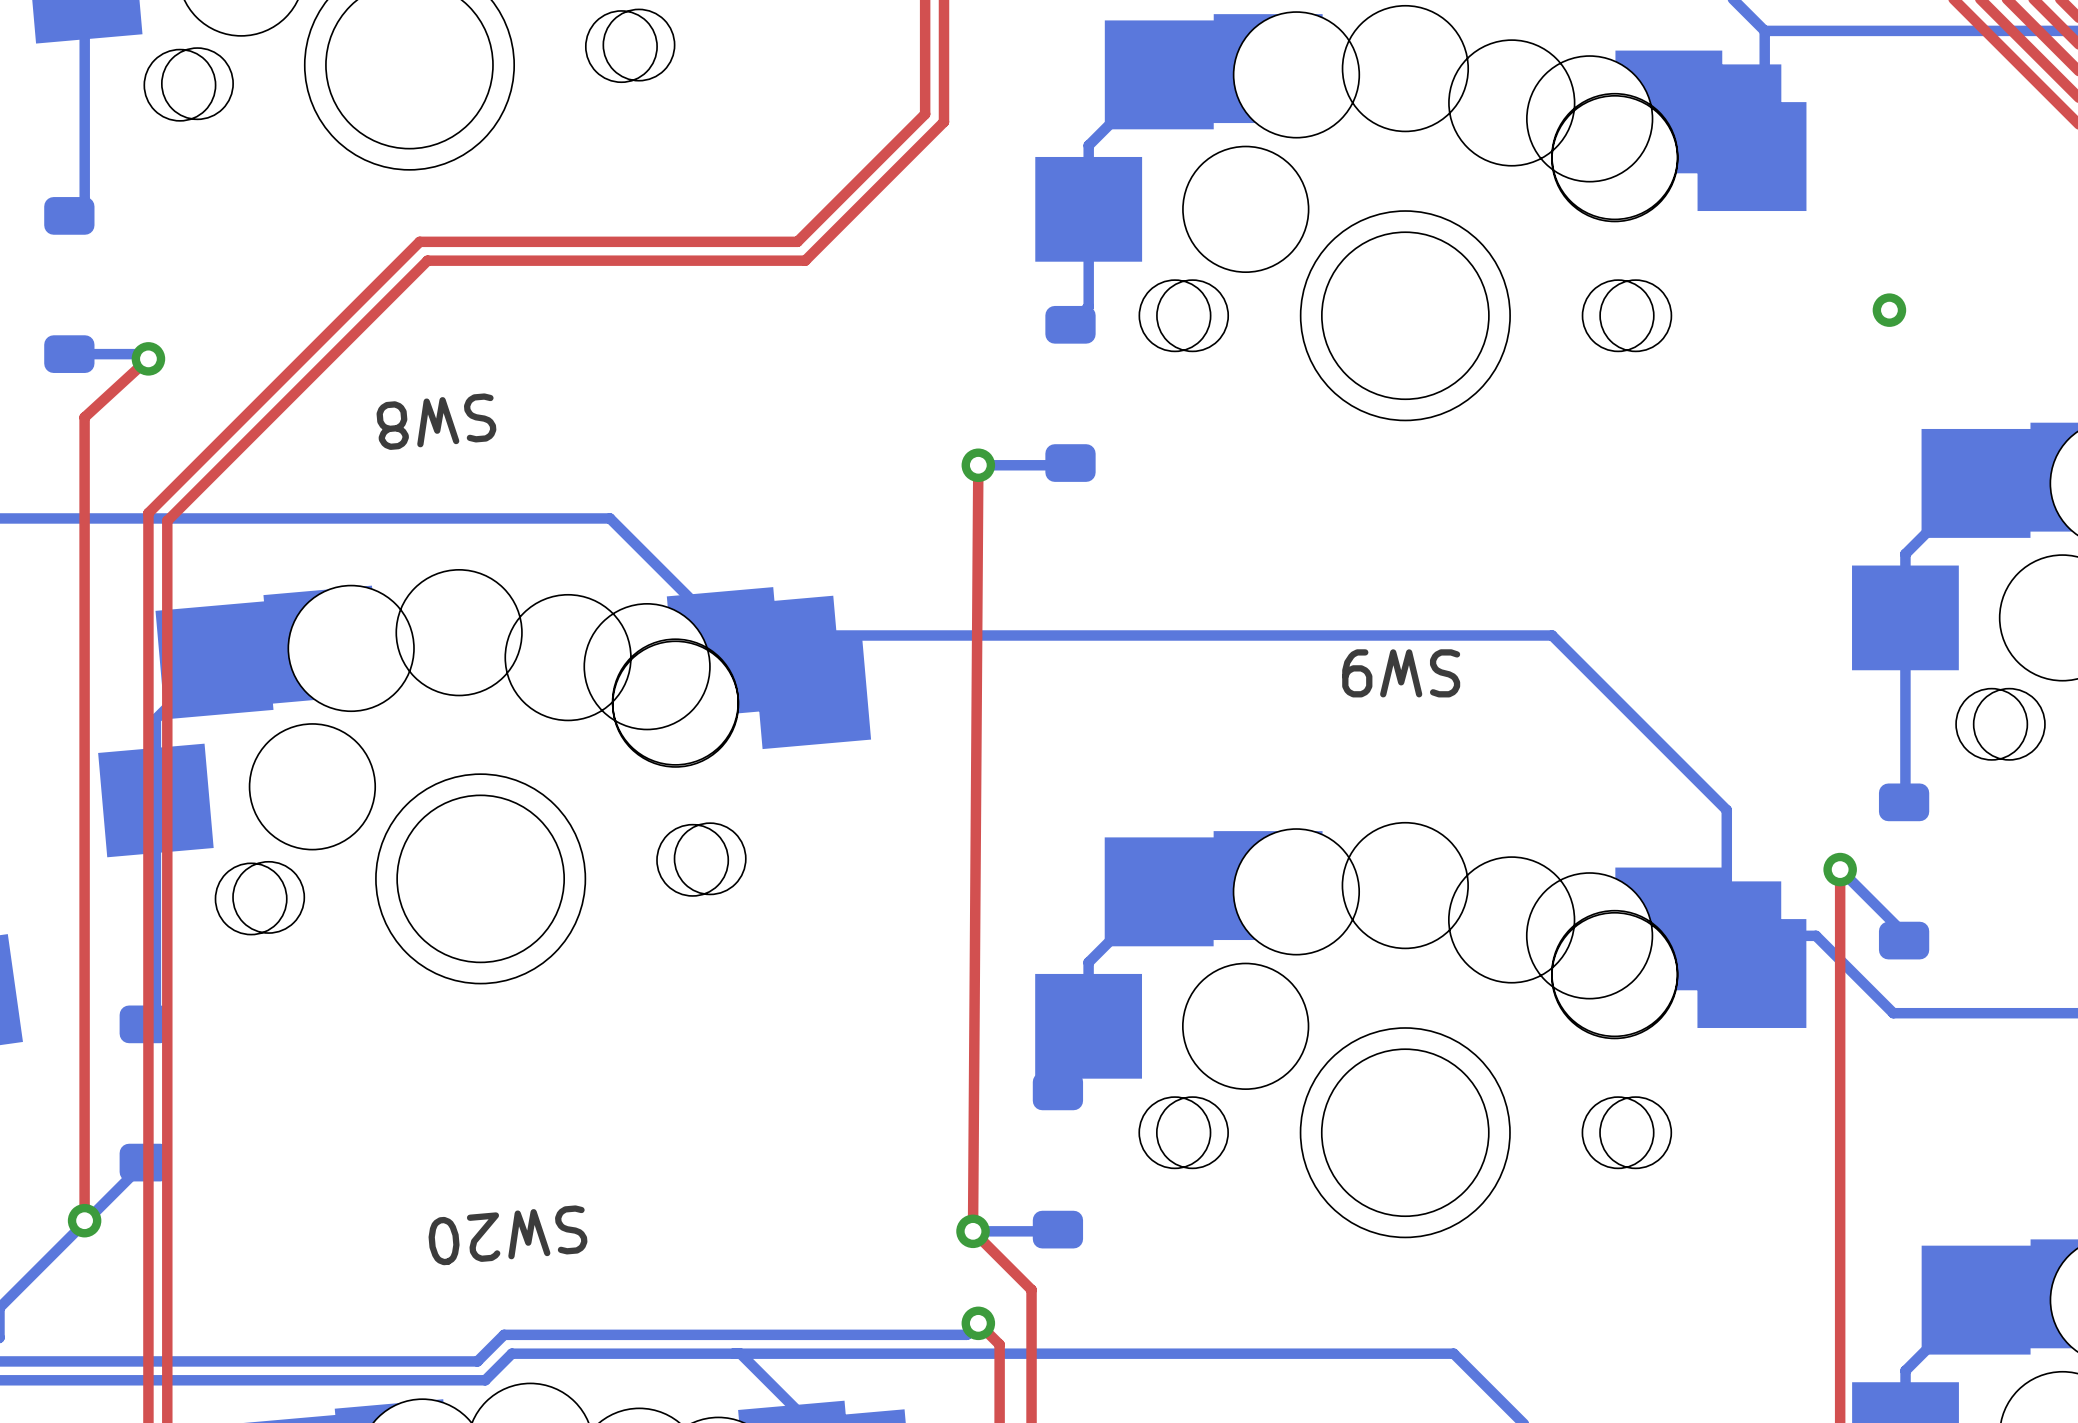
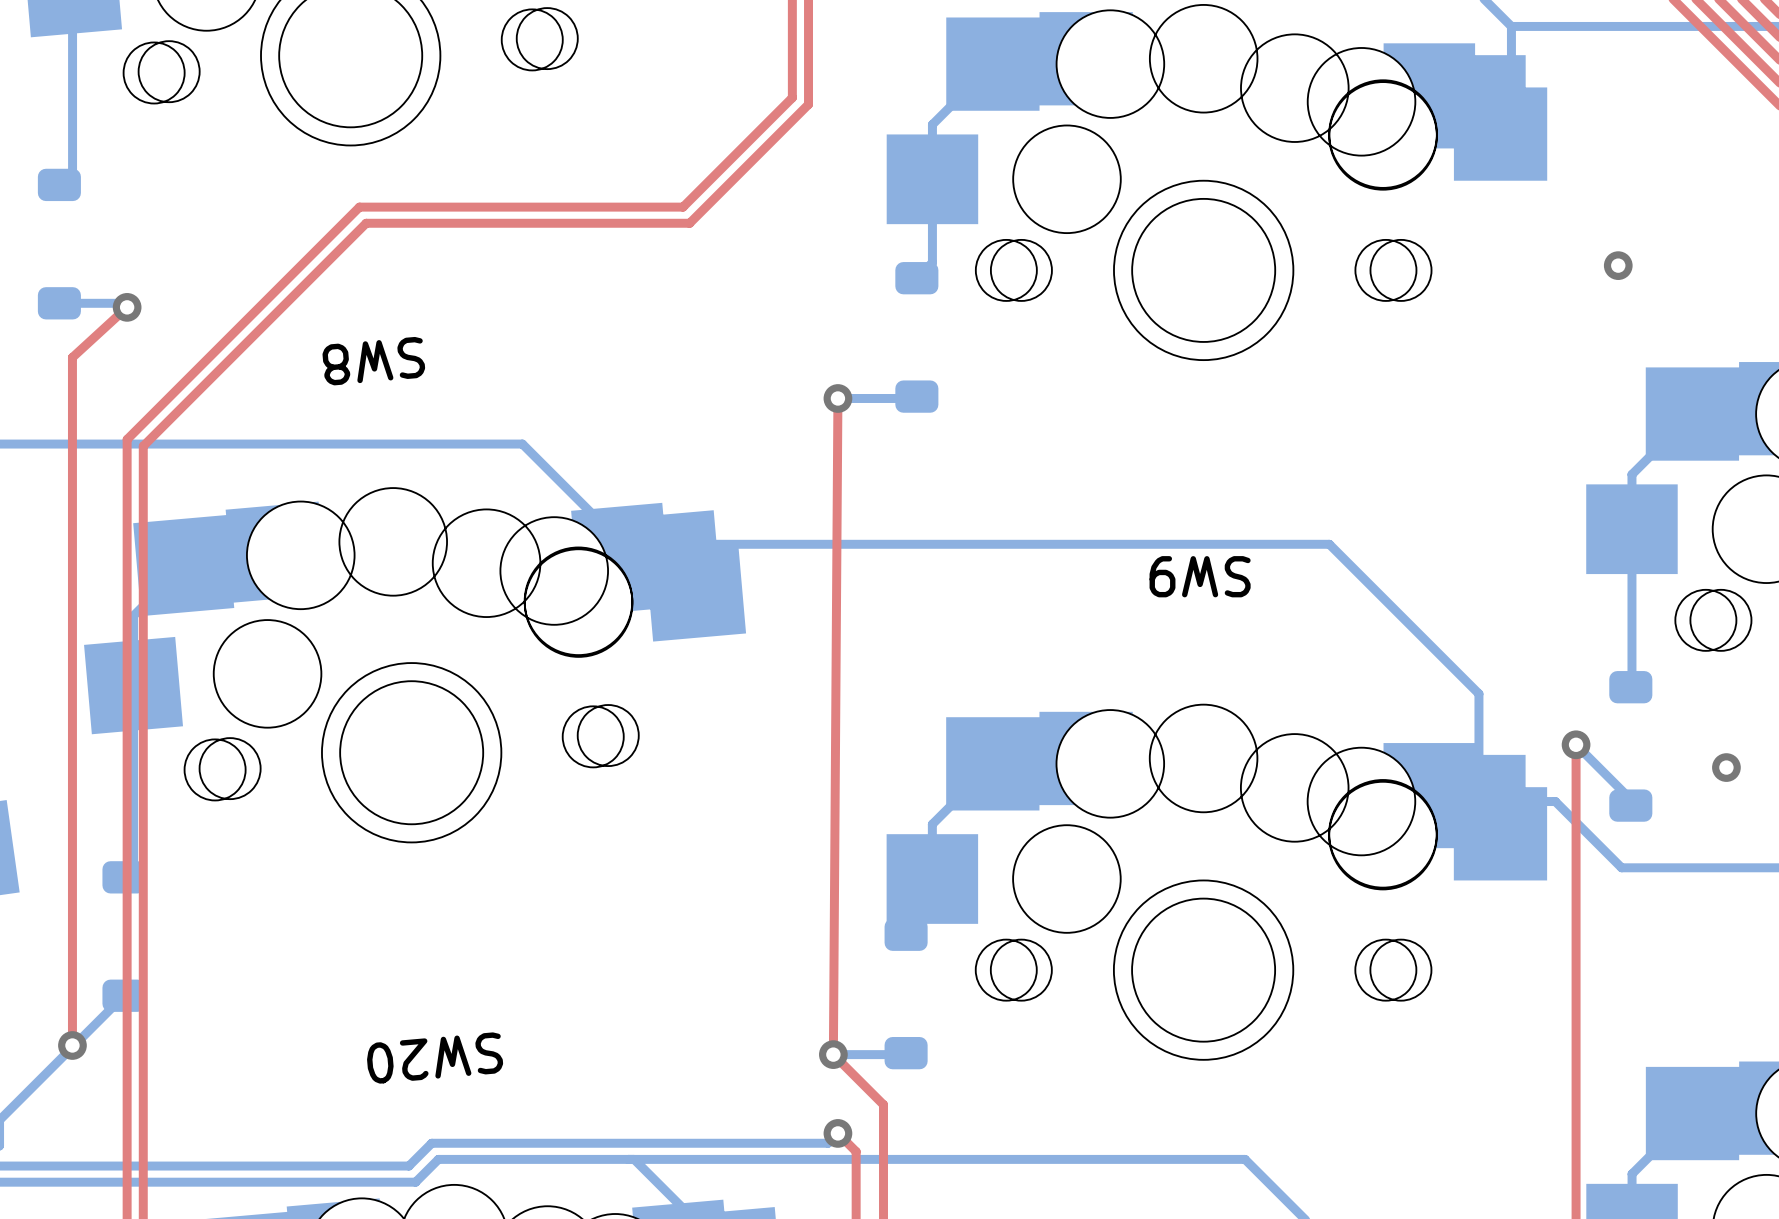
via: none -> (1726, 767)

